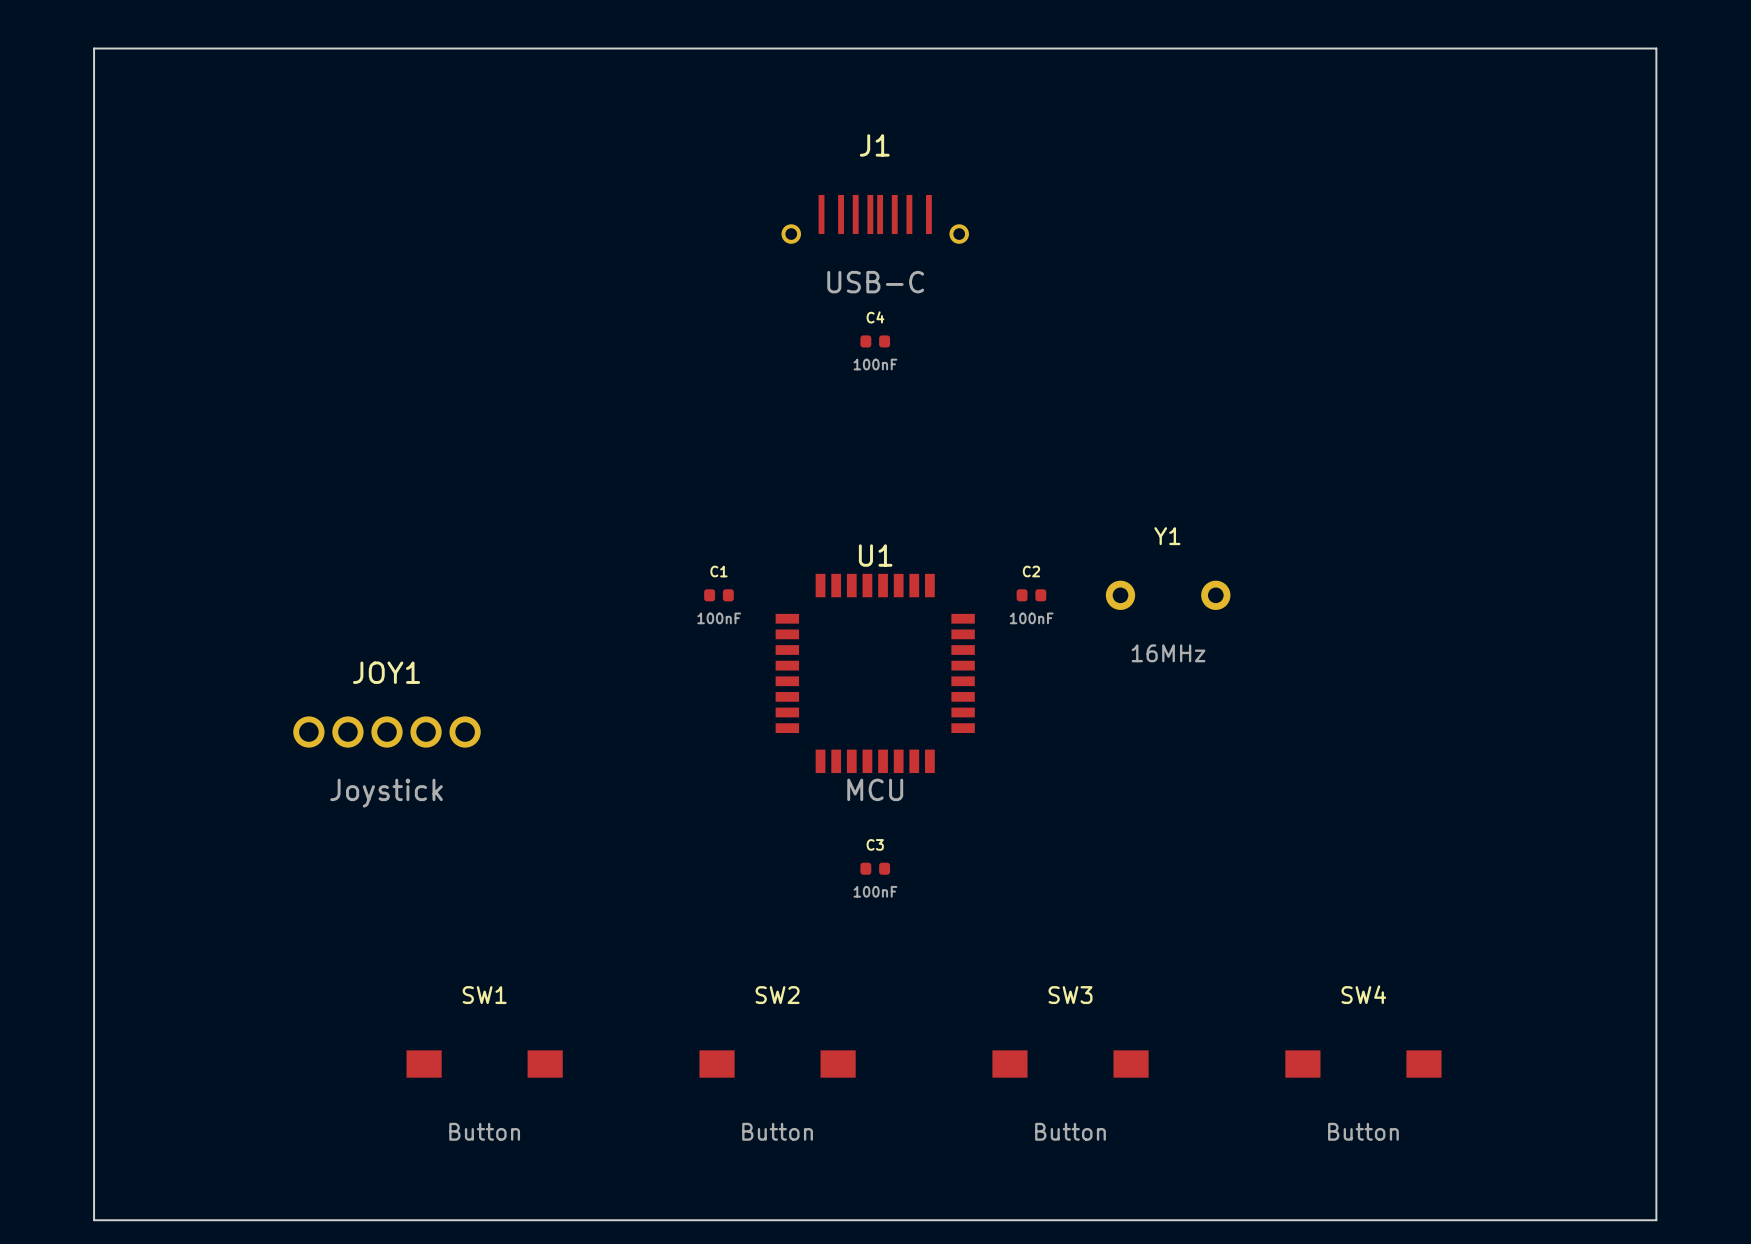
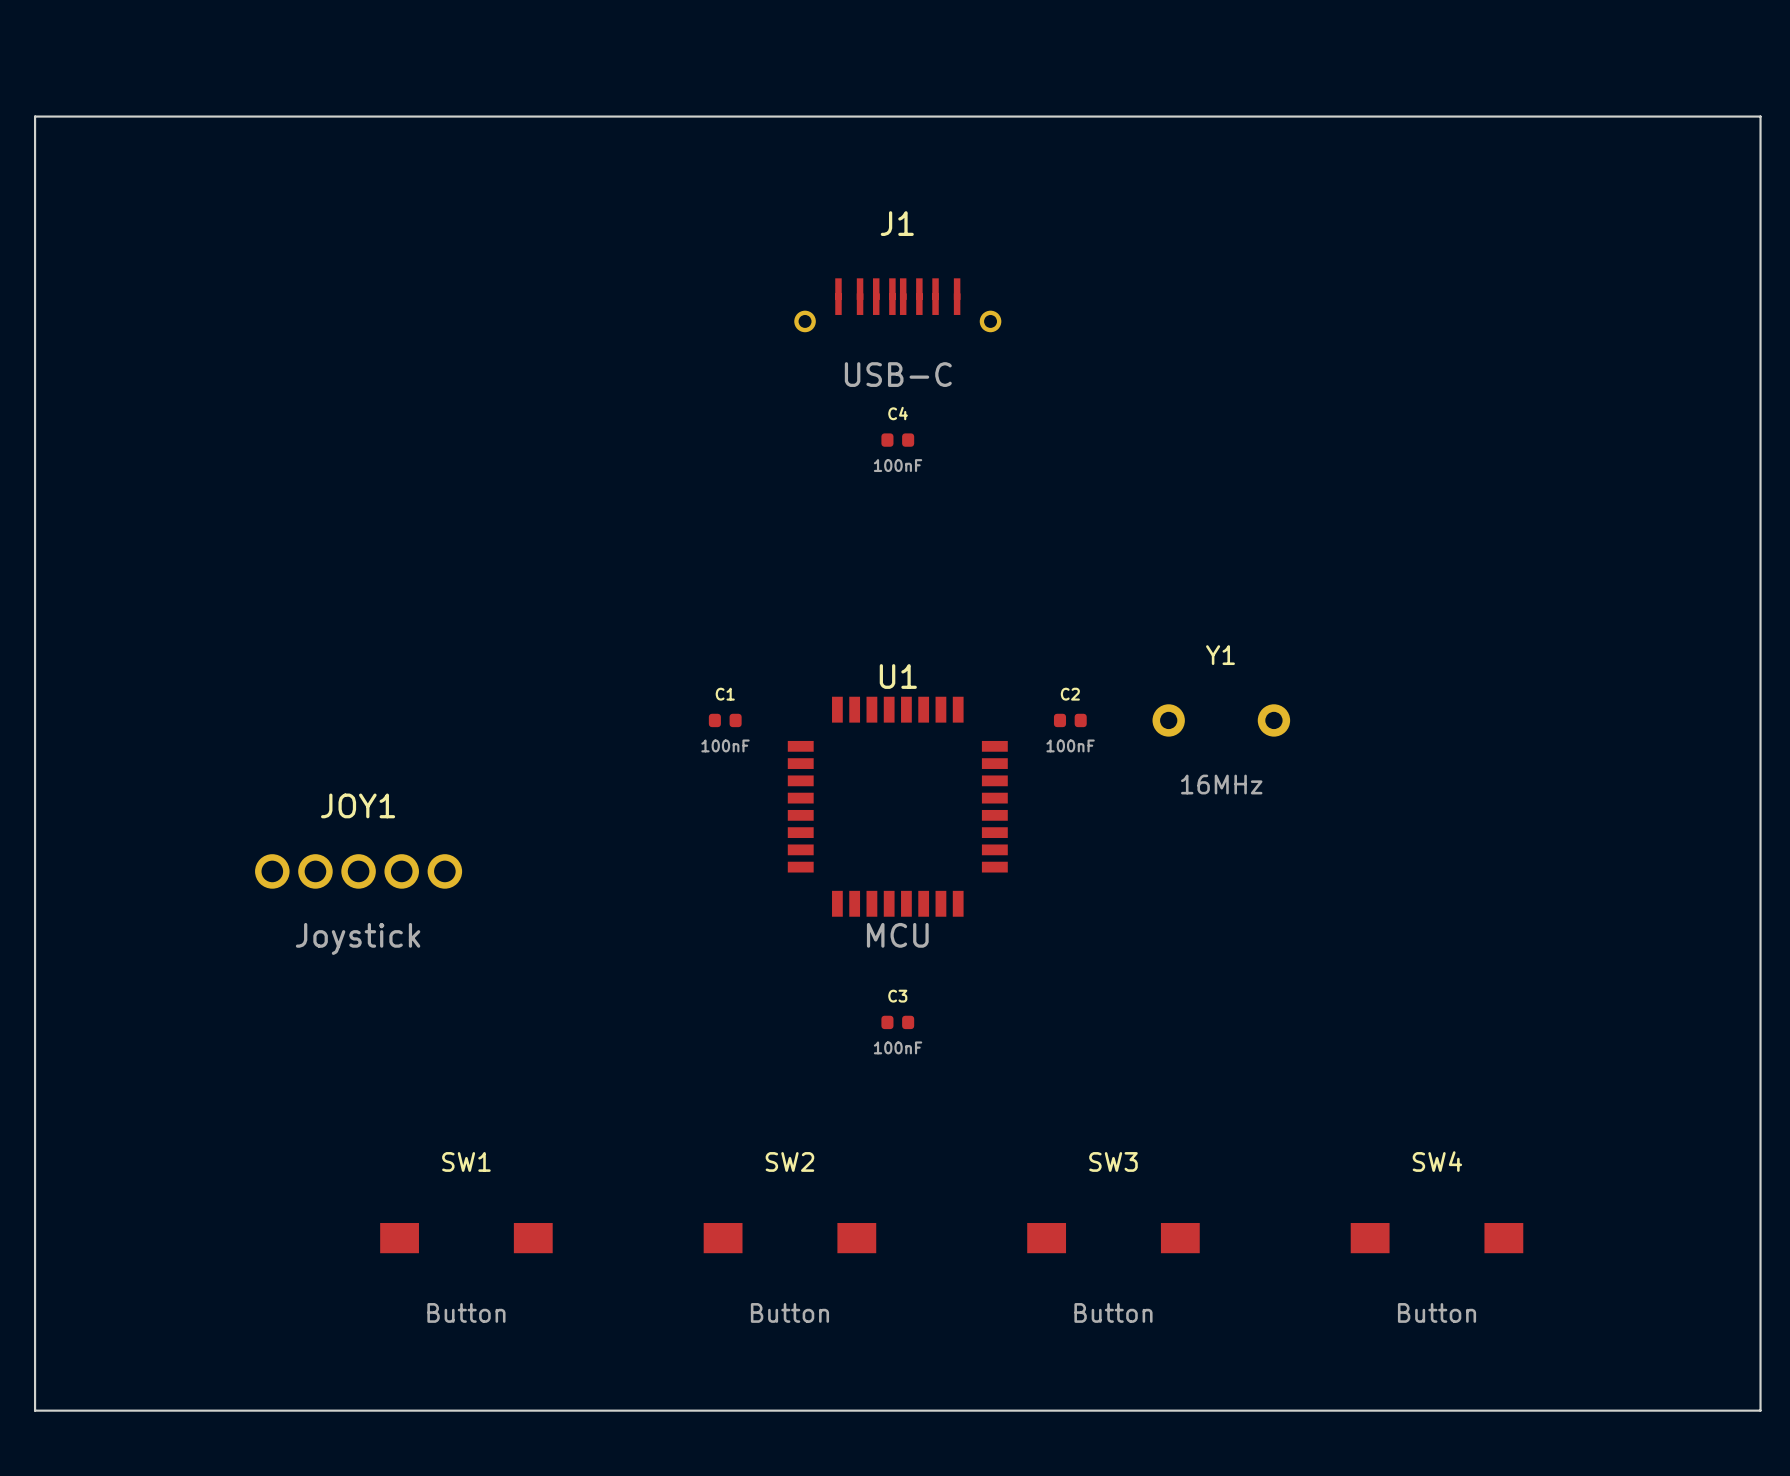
J1 footprint: [781, 194, 969, 244] -> [794, 278, 1002, 333]

